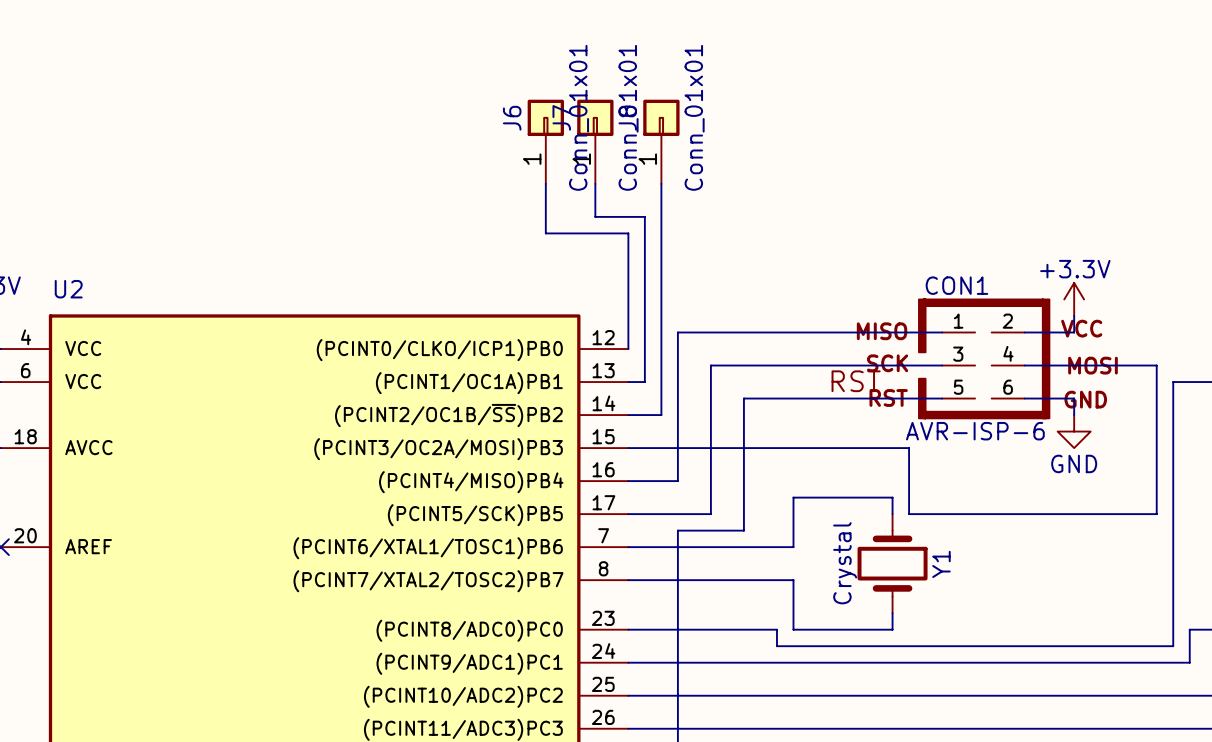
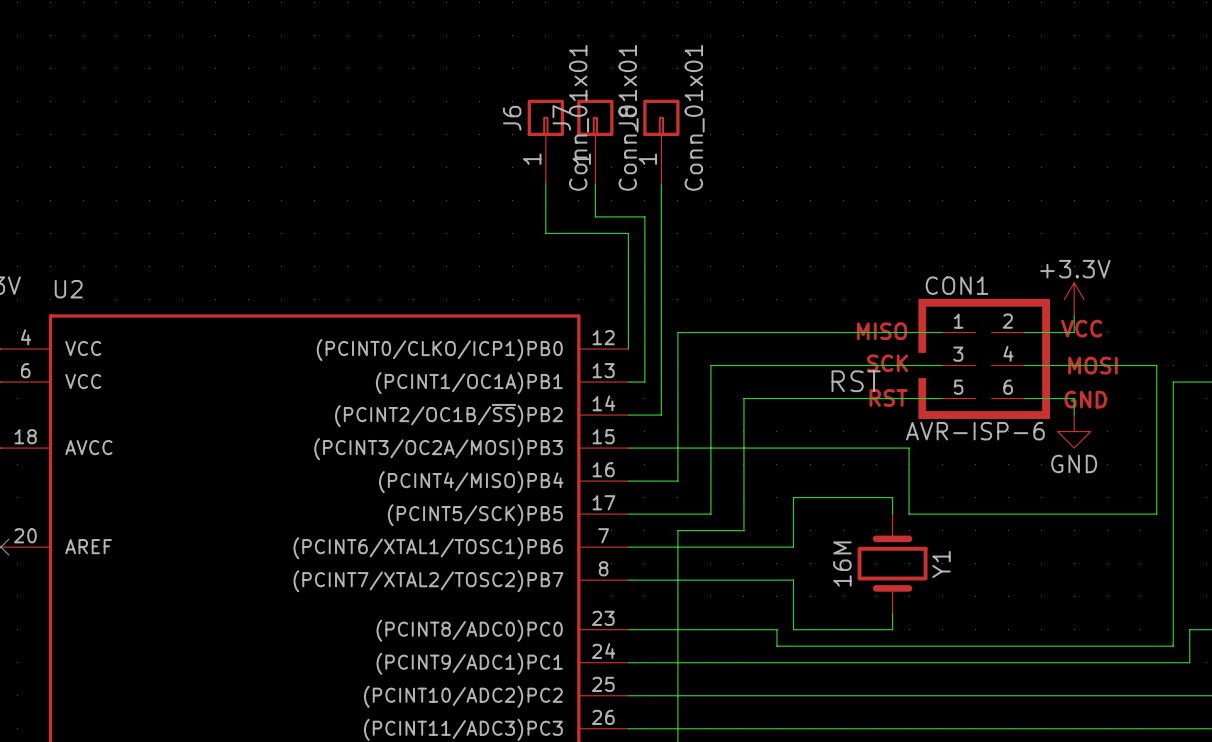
Y1 value: Crystal (845, 563) -> 16M (842, 564)

